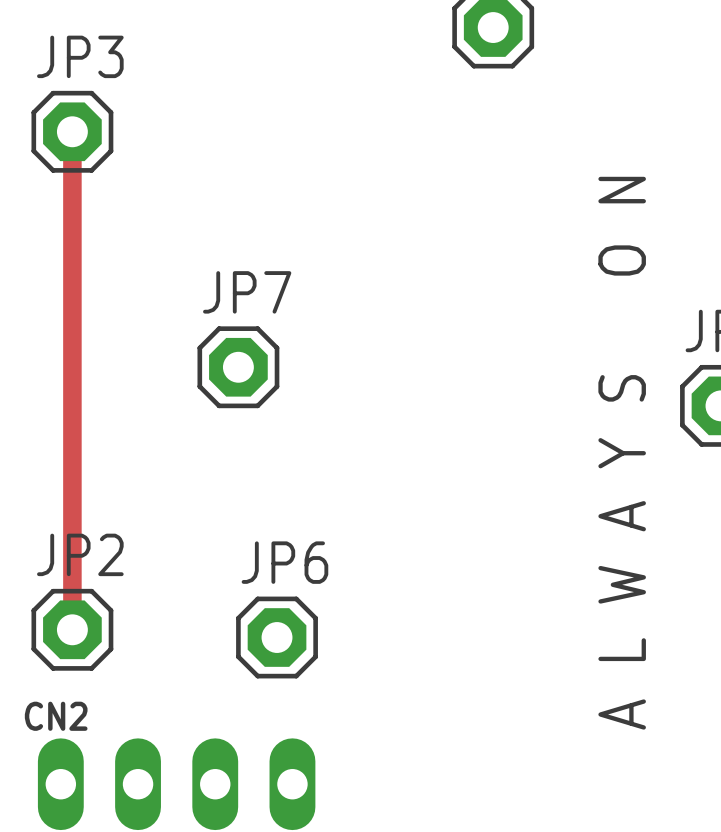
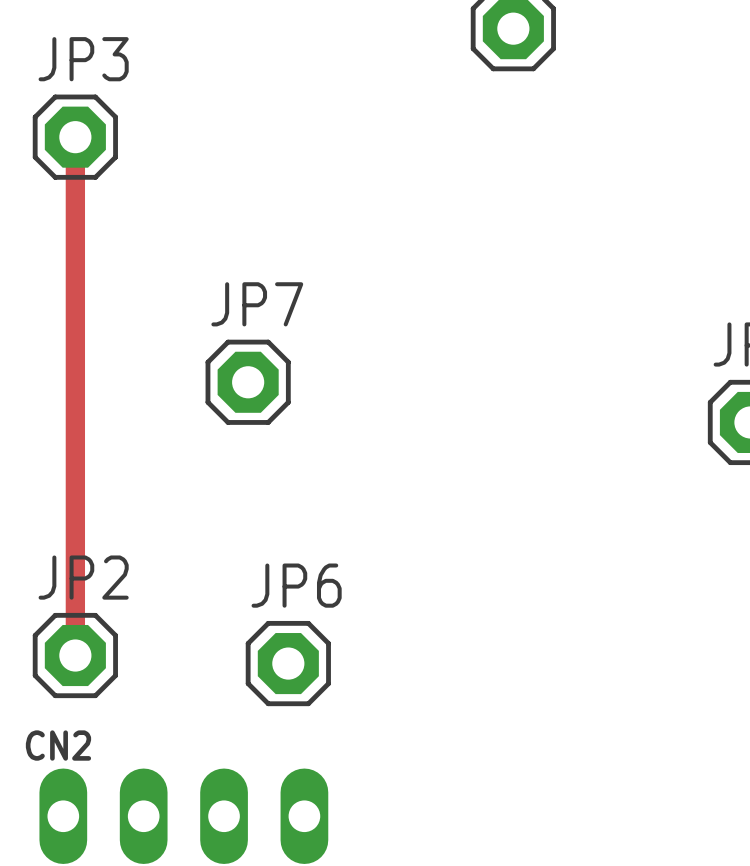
text: A L W A Y S O N (622, 453) -> none

